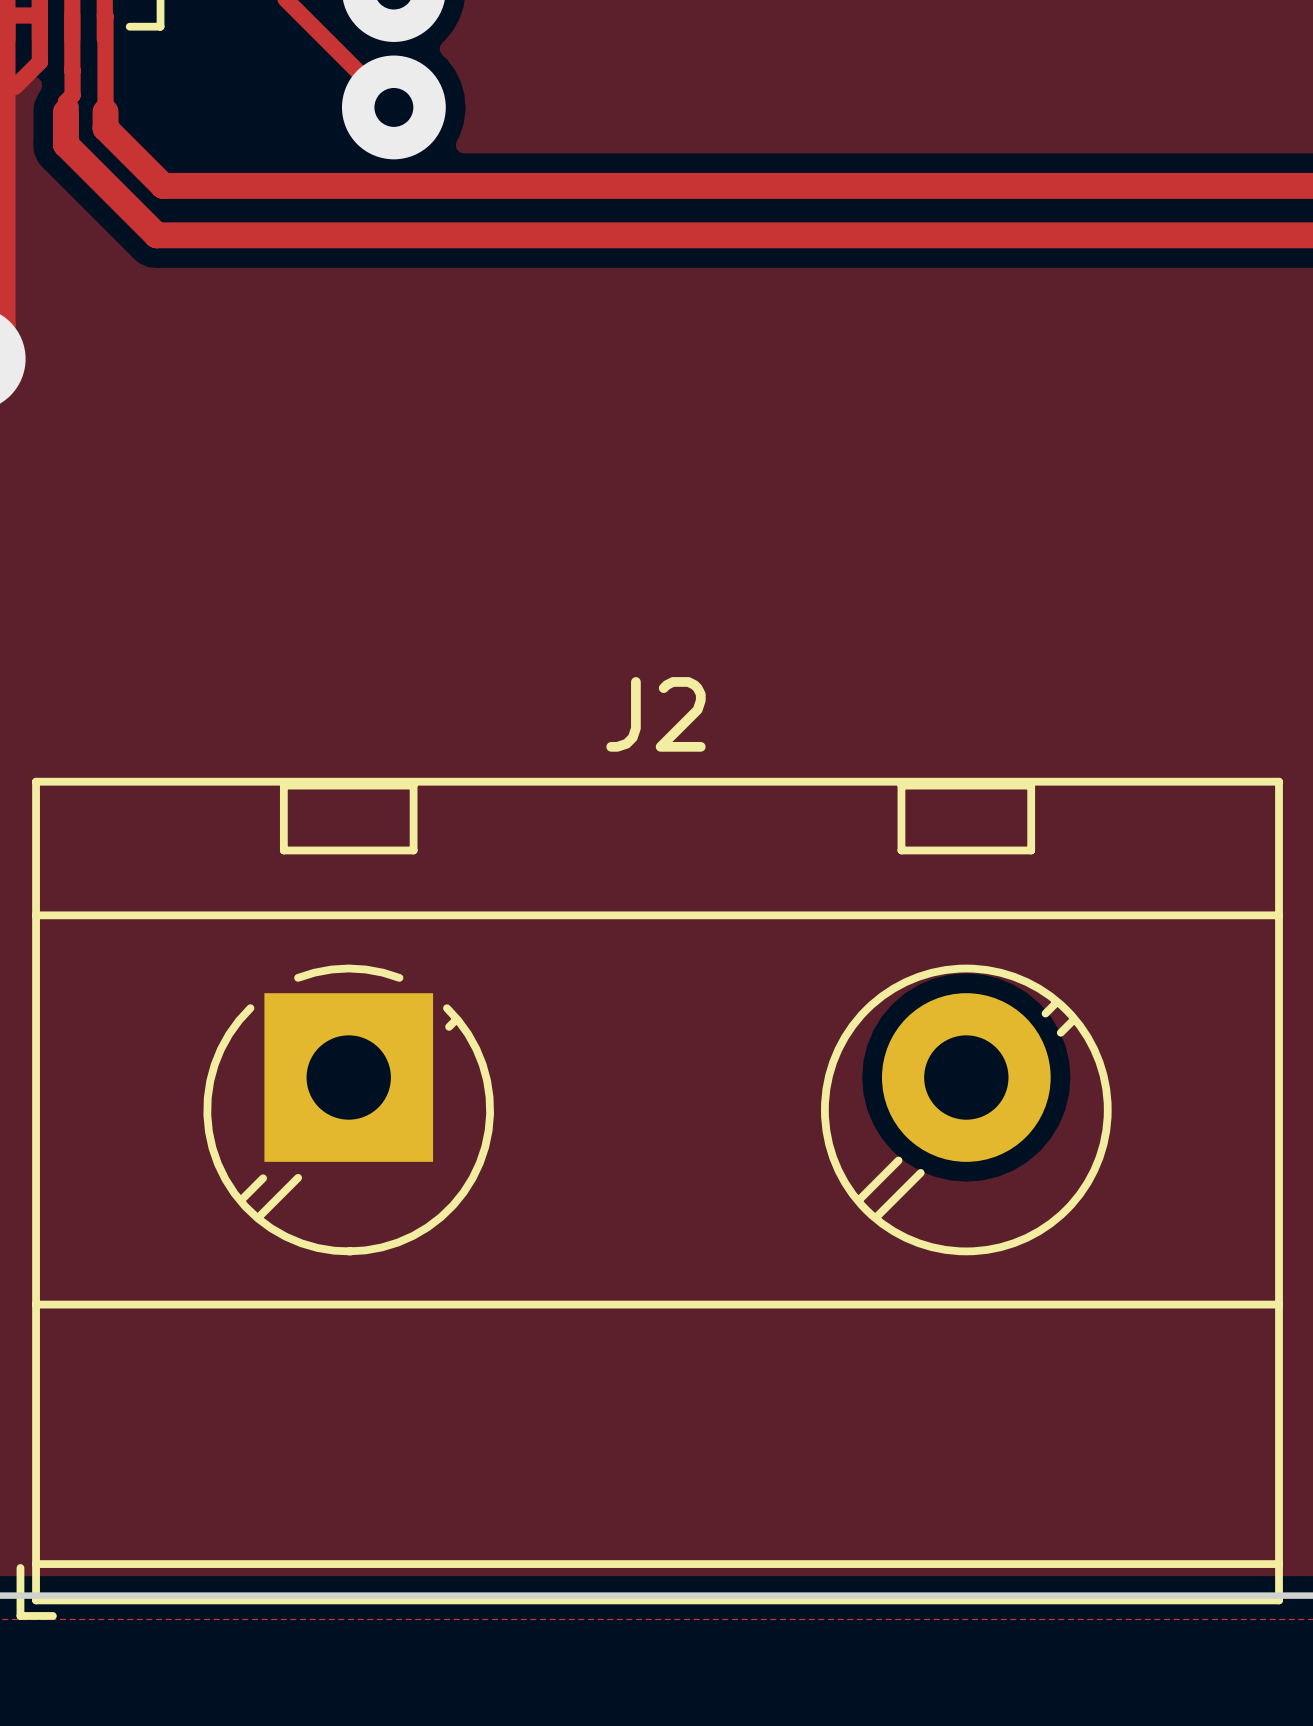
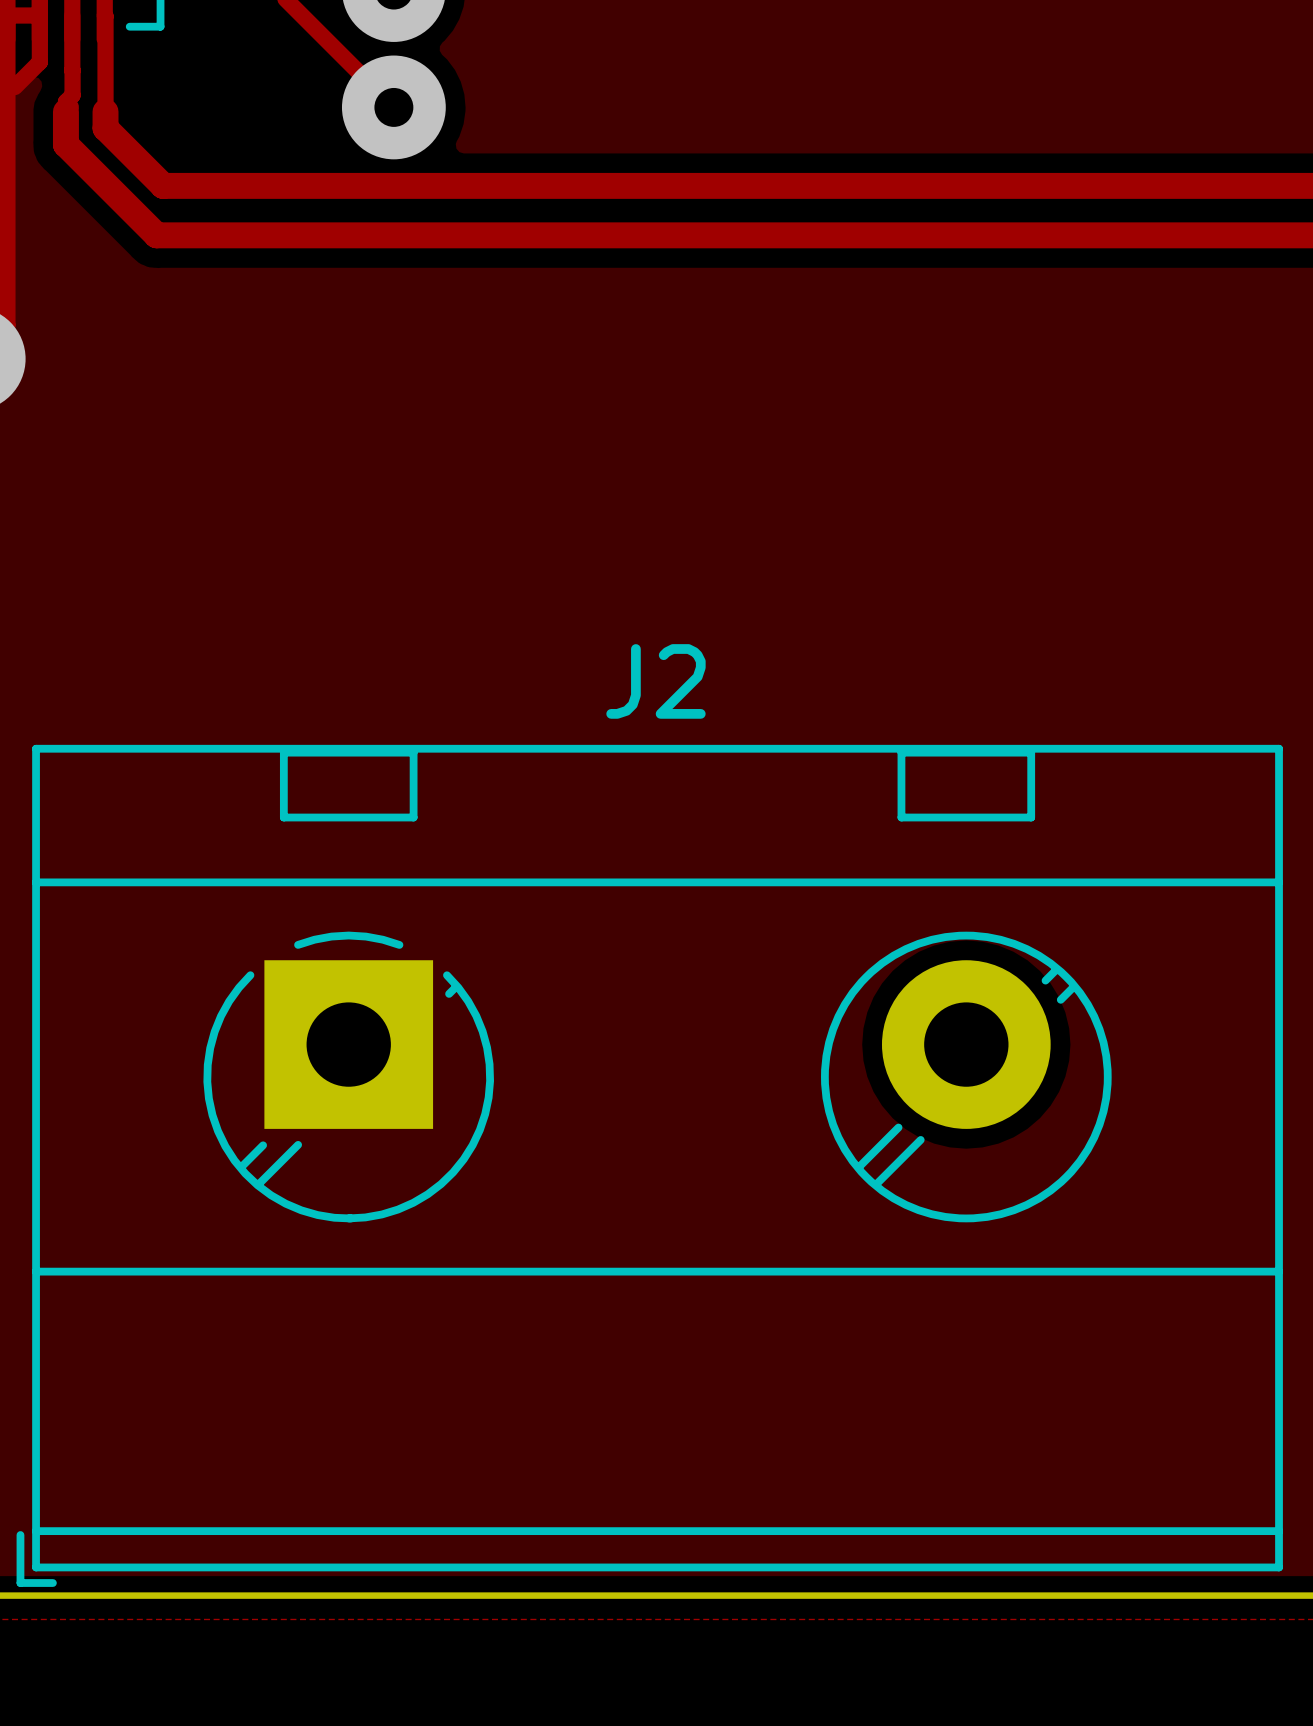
J2 position: (649, 1198) -> (649, 1165)

